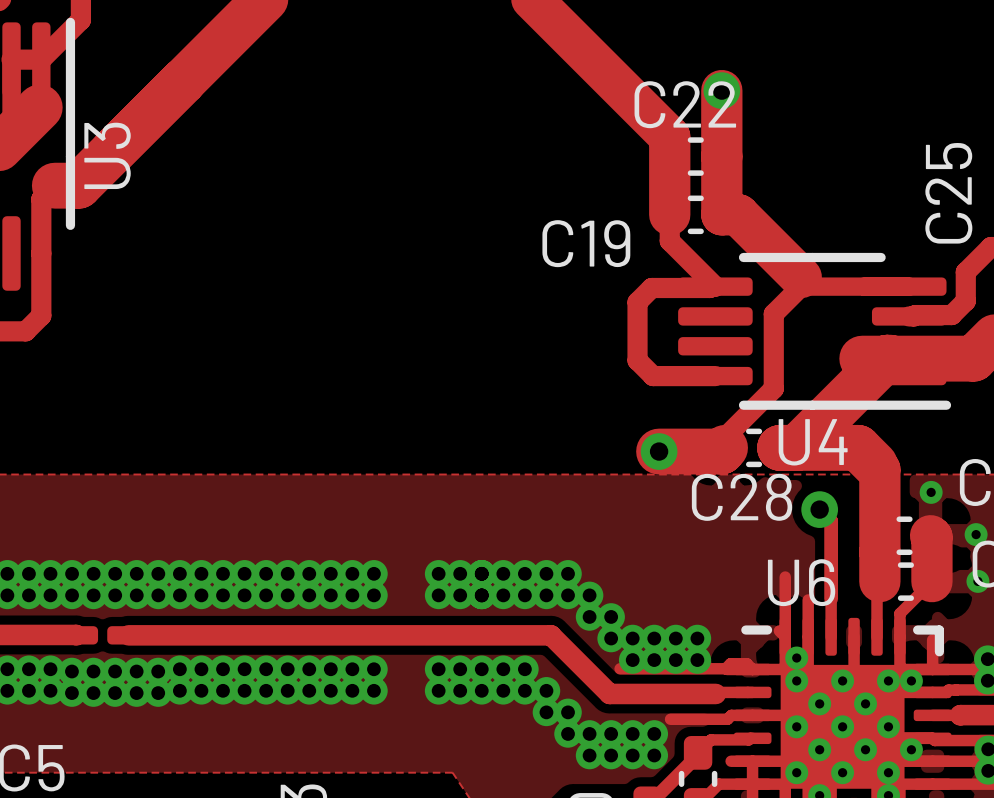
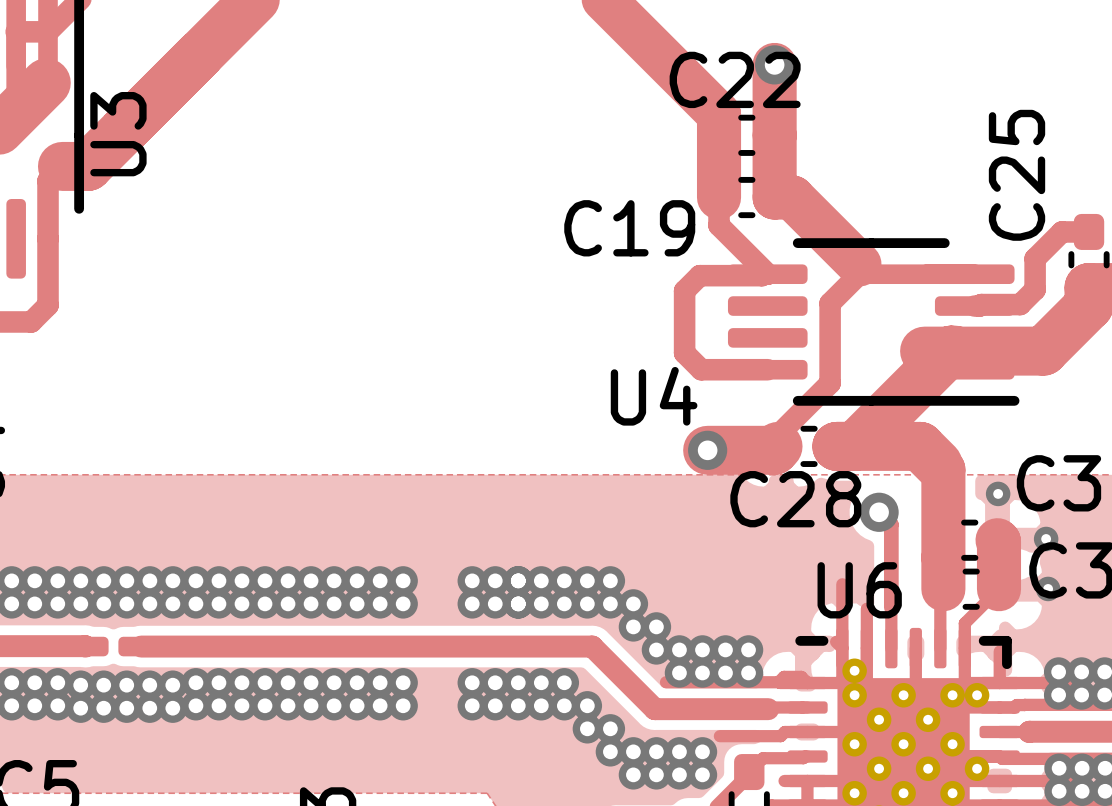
U4 name position: U4 (813, 442) -> U4 (654, 396)

